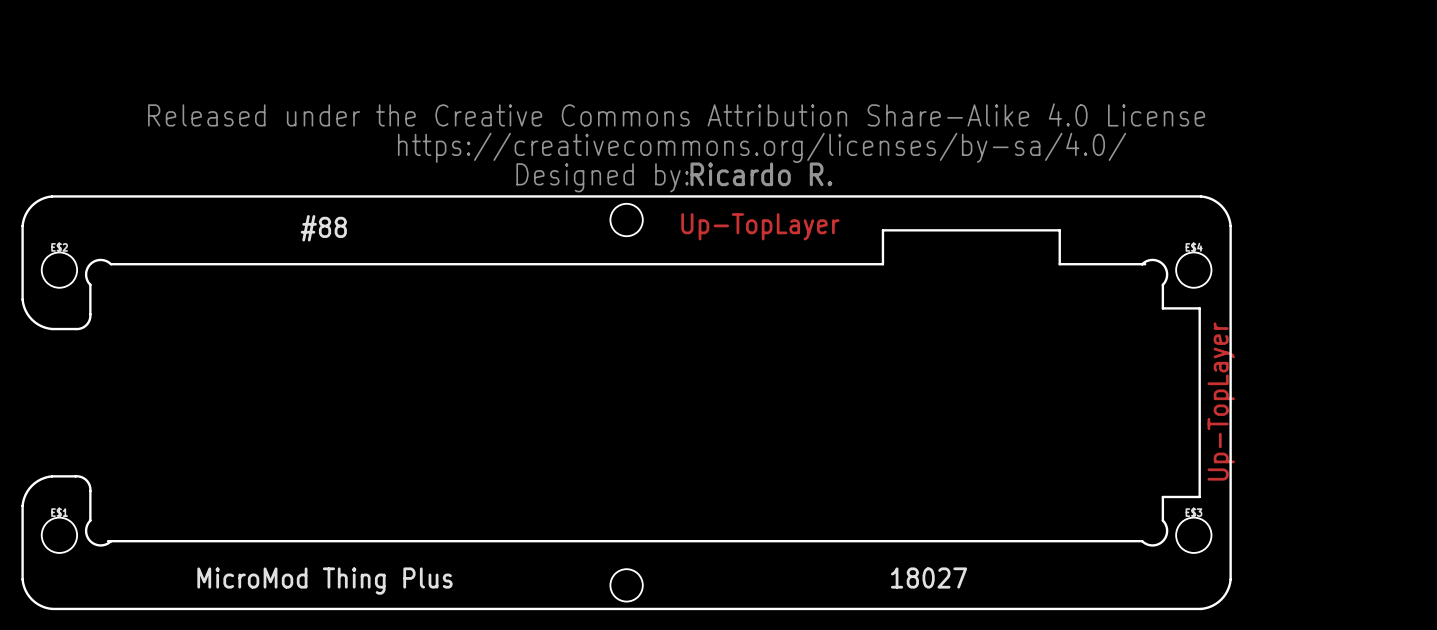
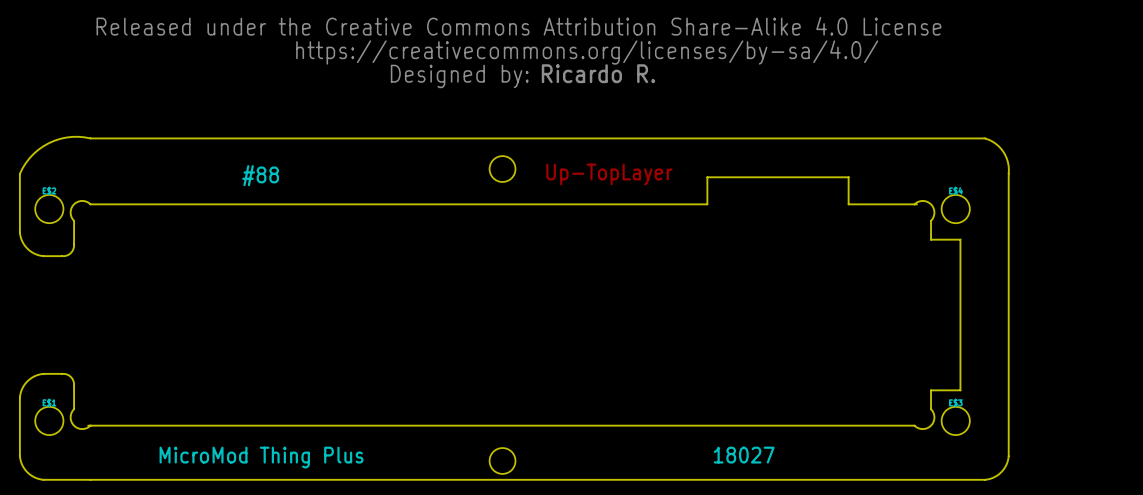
drawing position: (676, 147) -> (518, 52)
text position: Ricardo R. (761, 174) -> Ricardo R. (598, 73)
board edge: (22, 225) (25, 215) (31, 205) (41, 199) (52, 196) (1201, 196) (1208, 197) (1223, 208) (1230, 225) (1230, 579) (1227, 590) (1221, 599) (1212, 606) (1201, 608) -> (19, 173) (29, 158) (38, 149) (54, 140) (72, 136) (90, 138) (985, 138) (1001, 148) (1008, 166) (1008, 456) (1003, 470) (993, 477) (985, 479) (961, 479)
text: Up-TopLayer (1221, 401) -> none

